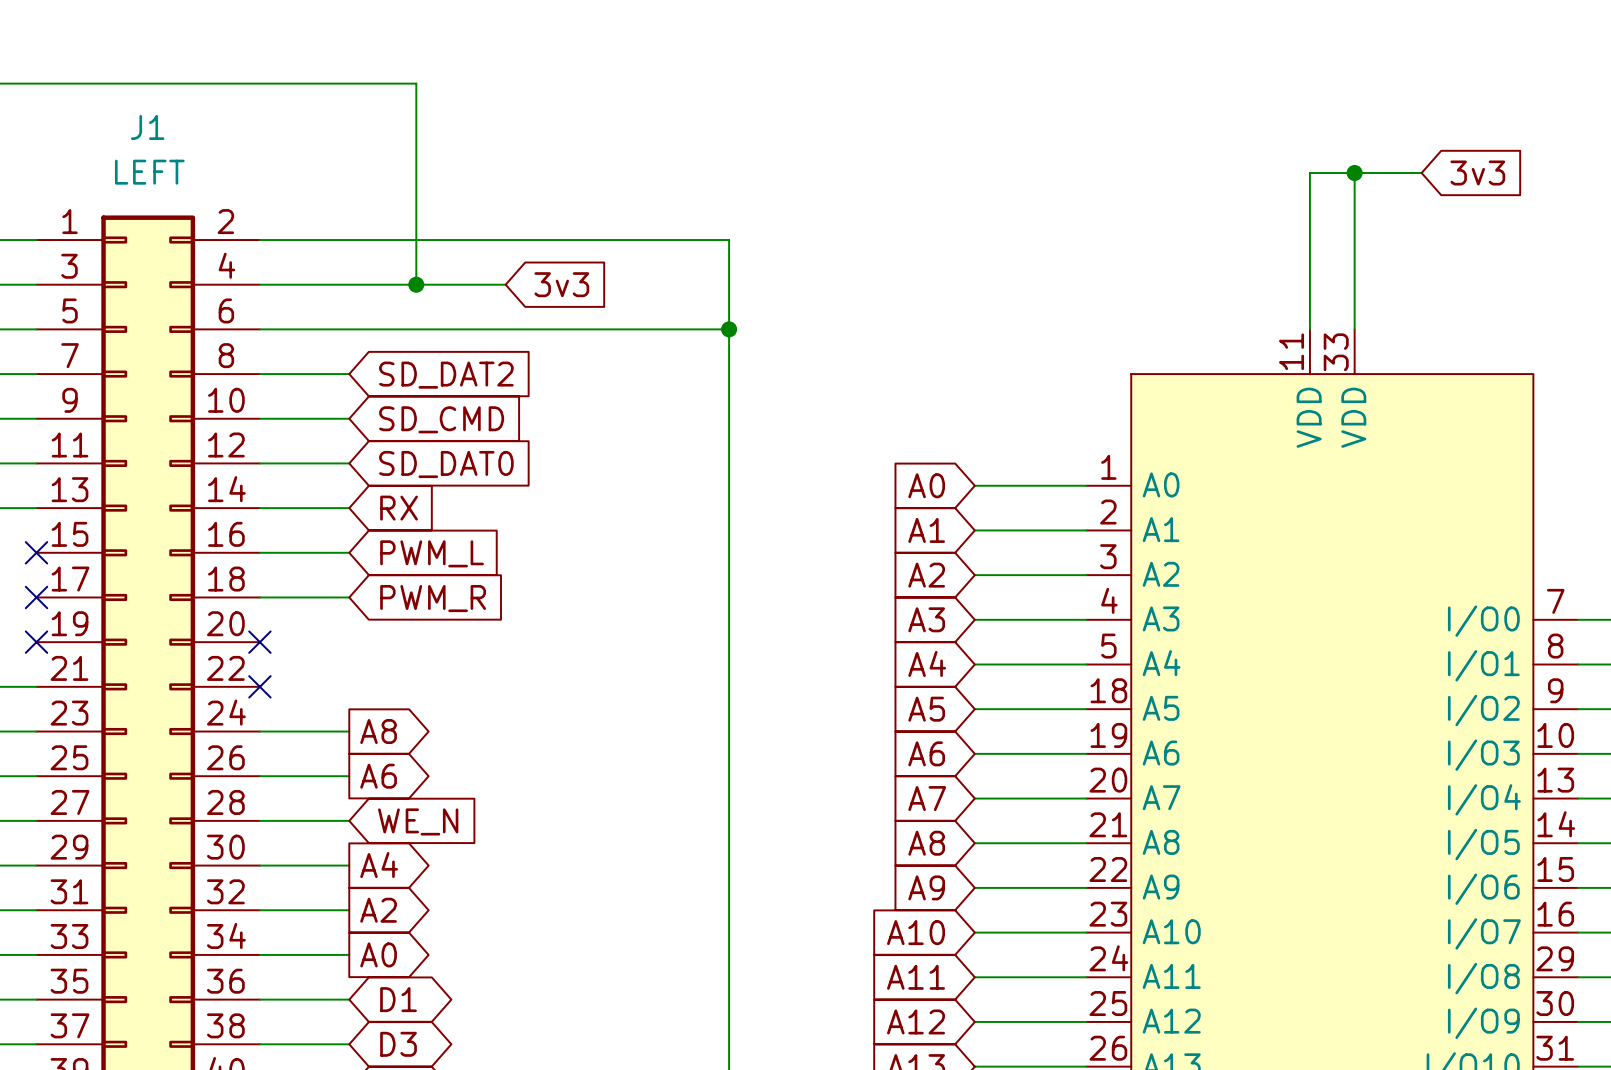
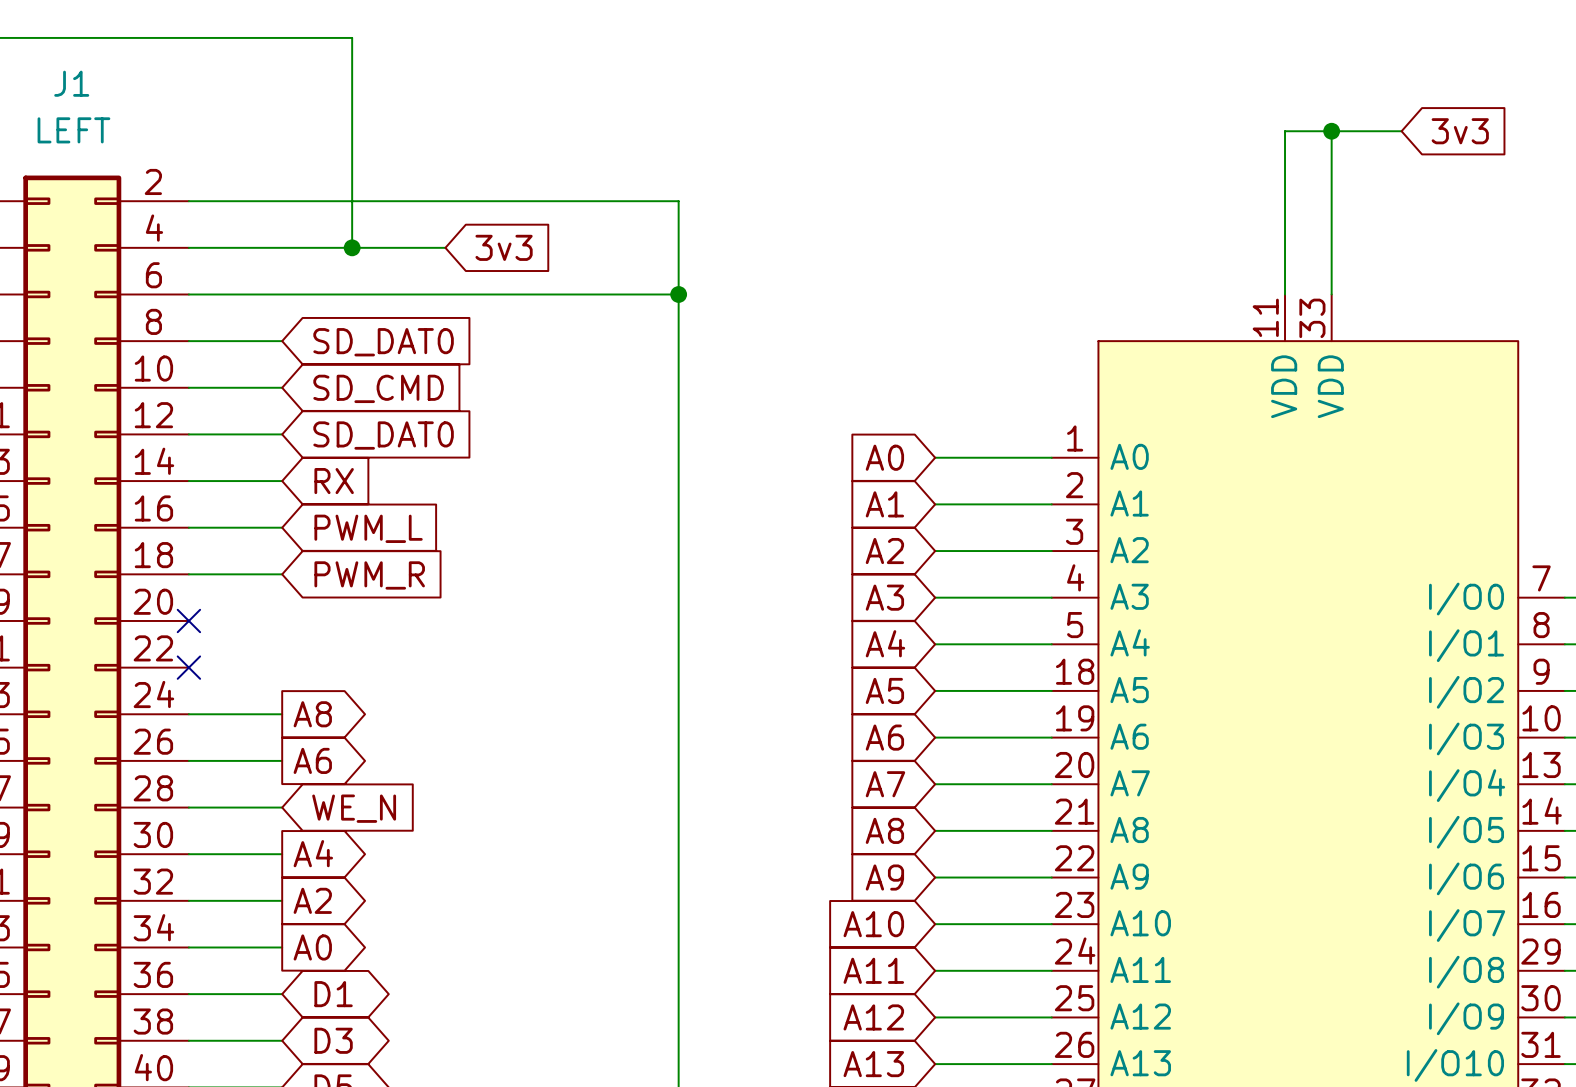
global label: SD_DAT2 (446, 375) -> SD_DAT0 (383, 342)

